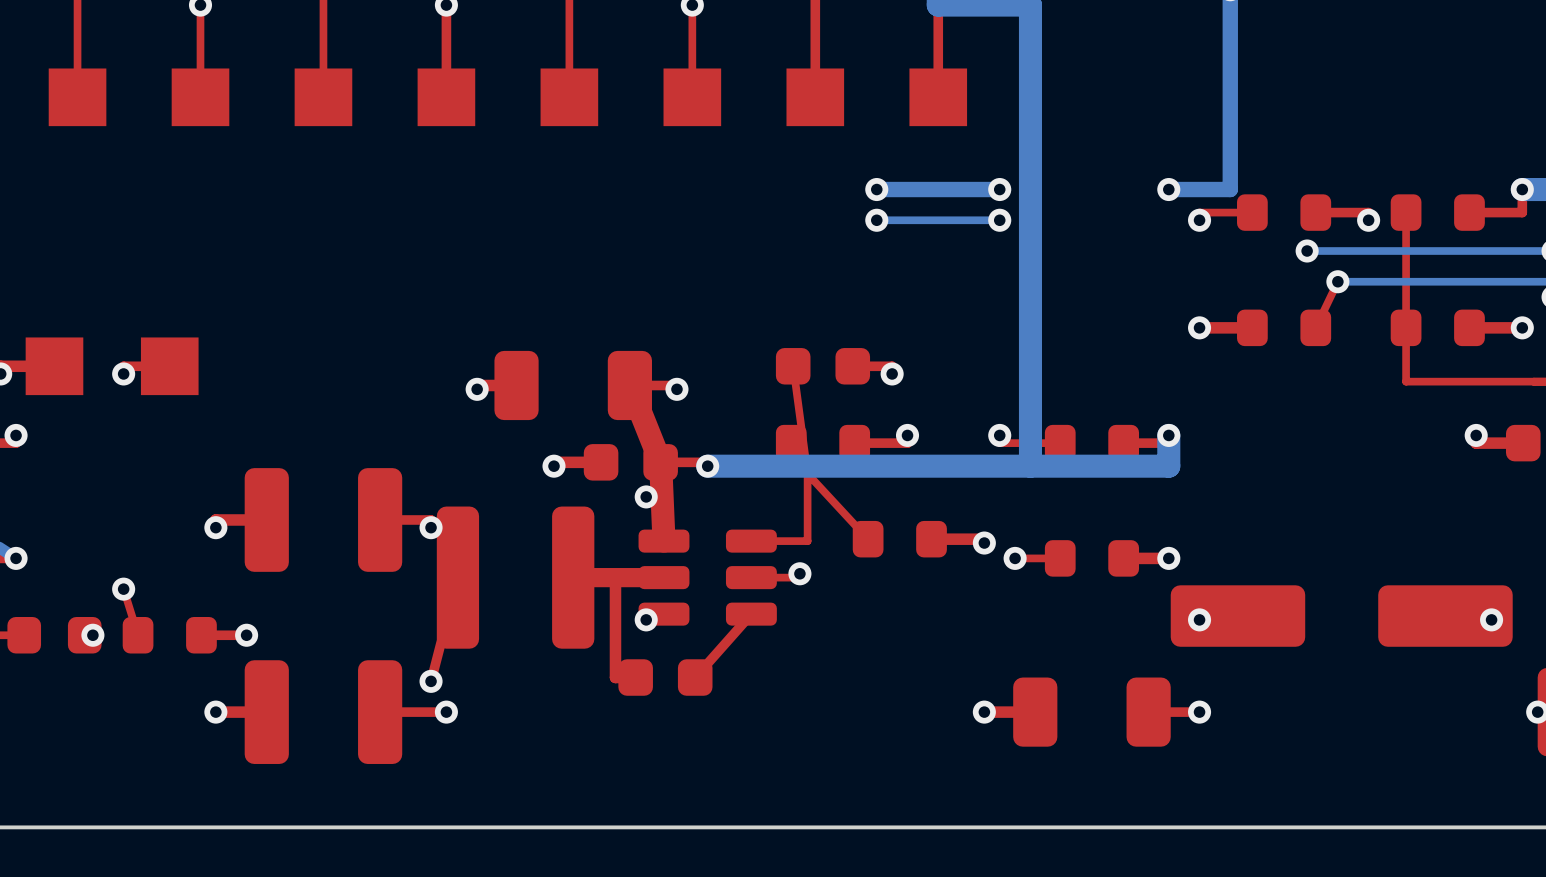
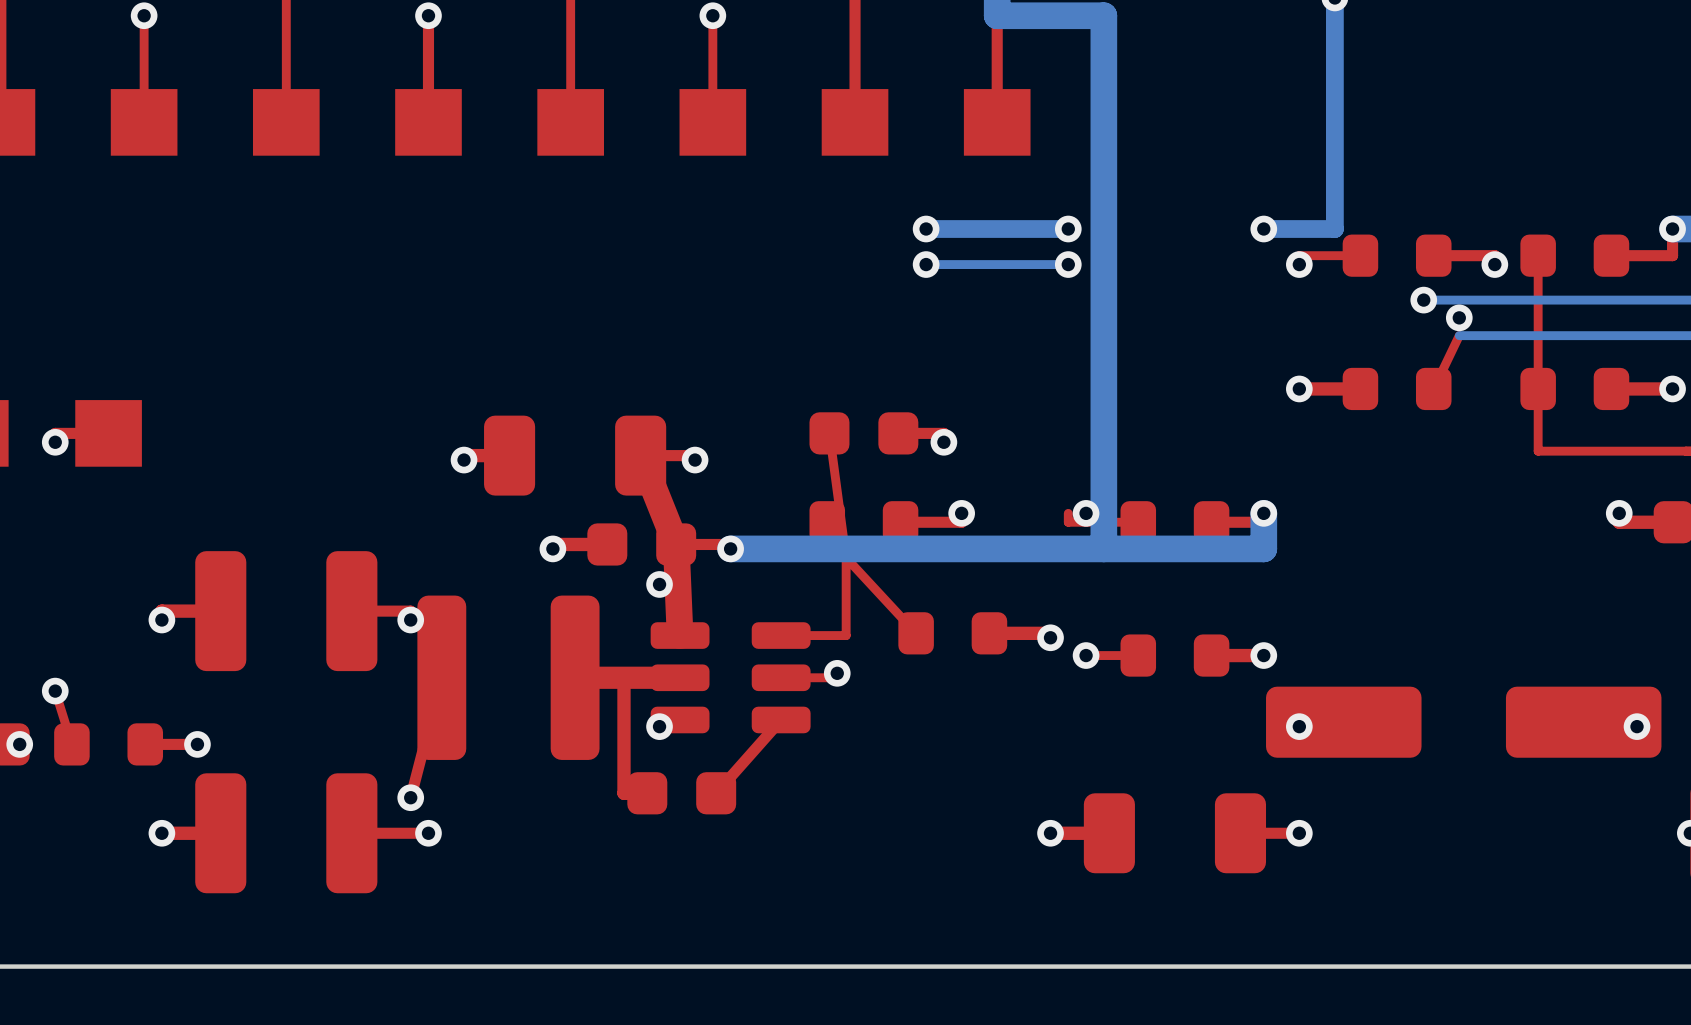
via position: (1337, 281) -> (1459, 317)
via position: (999, 435) -> (1086, 513)

